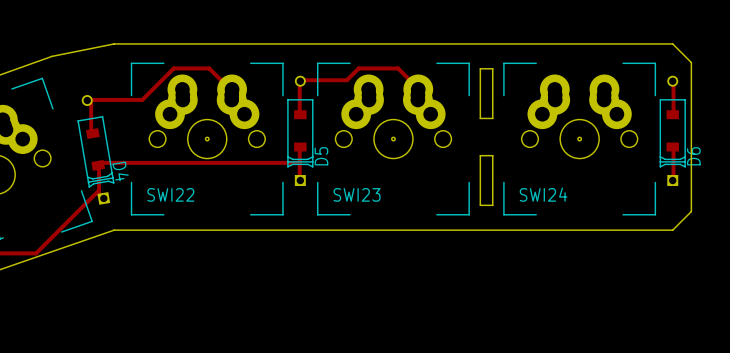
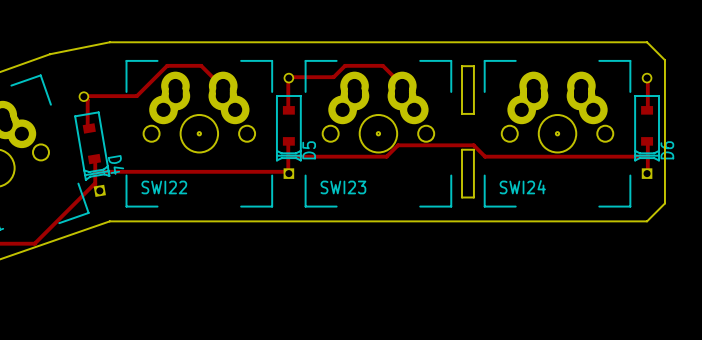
track: (299, 162) (99, 162) (98, 165) -> (288, 156) (386, 156) (398, 145) (473, 145) (485, 156) (647, 156)
track: none -> (95, 171) (288, 171)

